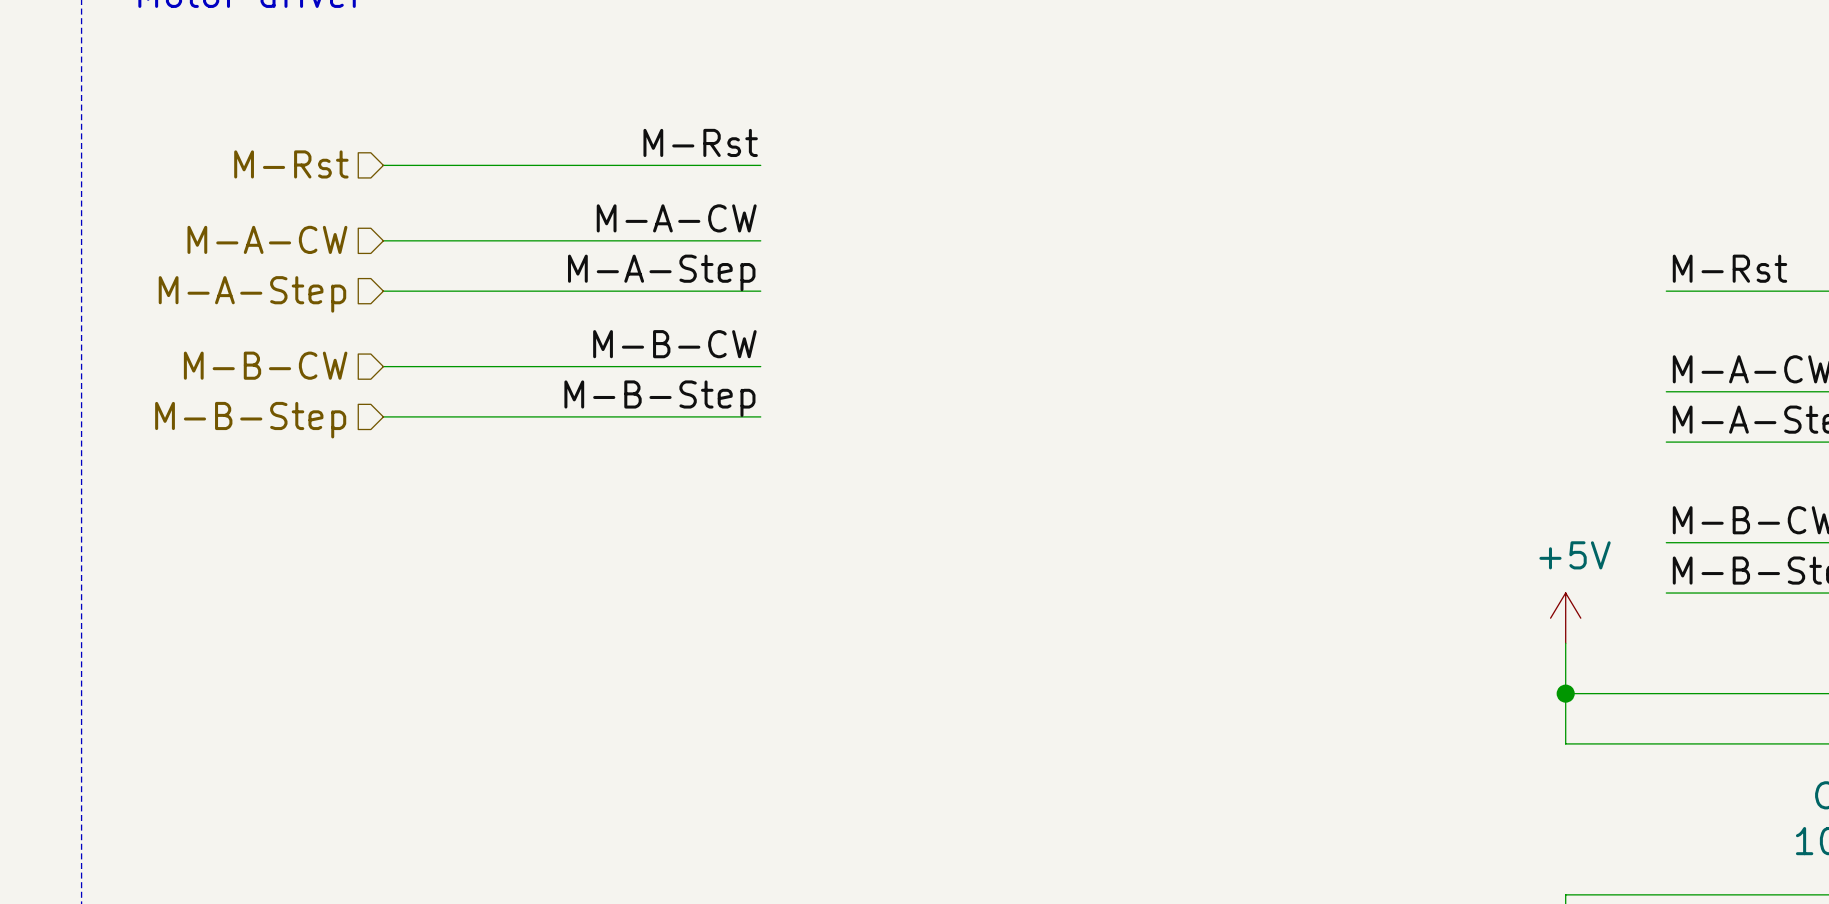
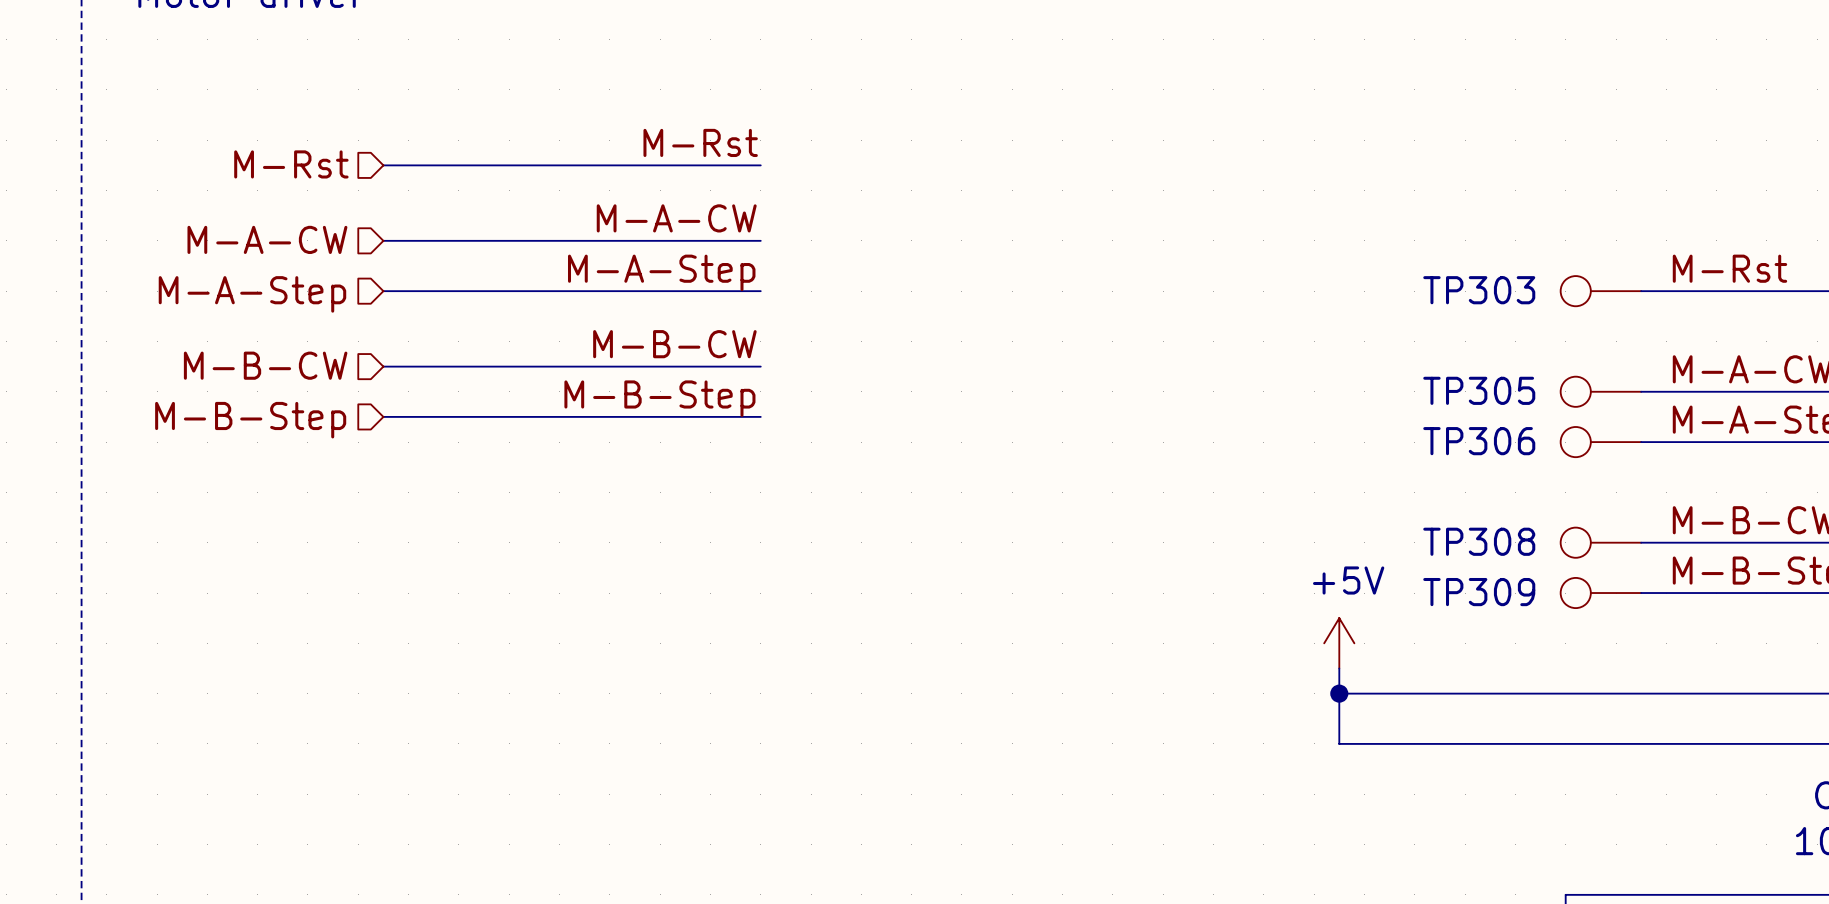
TP303: none -> (1600, 291)
wire: none -> (1641, 291) (1666, 291)
TP305: none -> (1600, 391)
wire: none -> (1641, 391) (1666, 391)
TP306: none -> (1600, 442)
wire: none -> (1641, 442) (1666, 442)
TP308: none -> (1600, 542)
wire: none -> (1641, 542) (1666, 542)
TP309: none -> (1600, 593)
wire: none -> (1641, 593) (1666, 593)
power symbol position: +5V (1565, 618) -> +5V (1339, 643)
wire: (1565, 643) (1565, 743) -> (1339, 668) (1339, 743) (1565, 743)
wire: none -> (1339, 693) (1565, 693)
junction: none -> (1339, 693)
junction: (1565, 693) -> none

